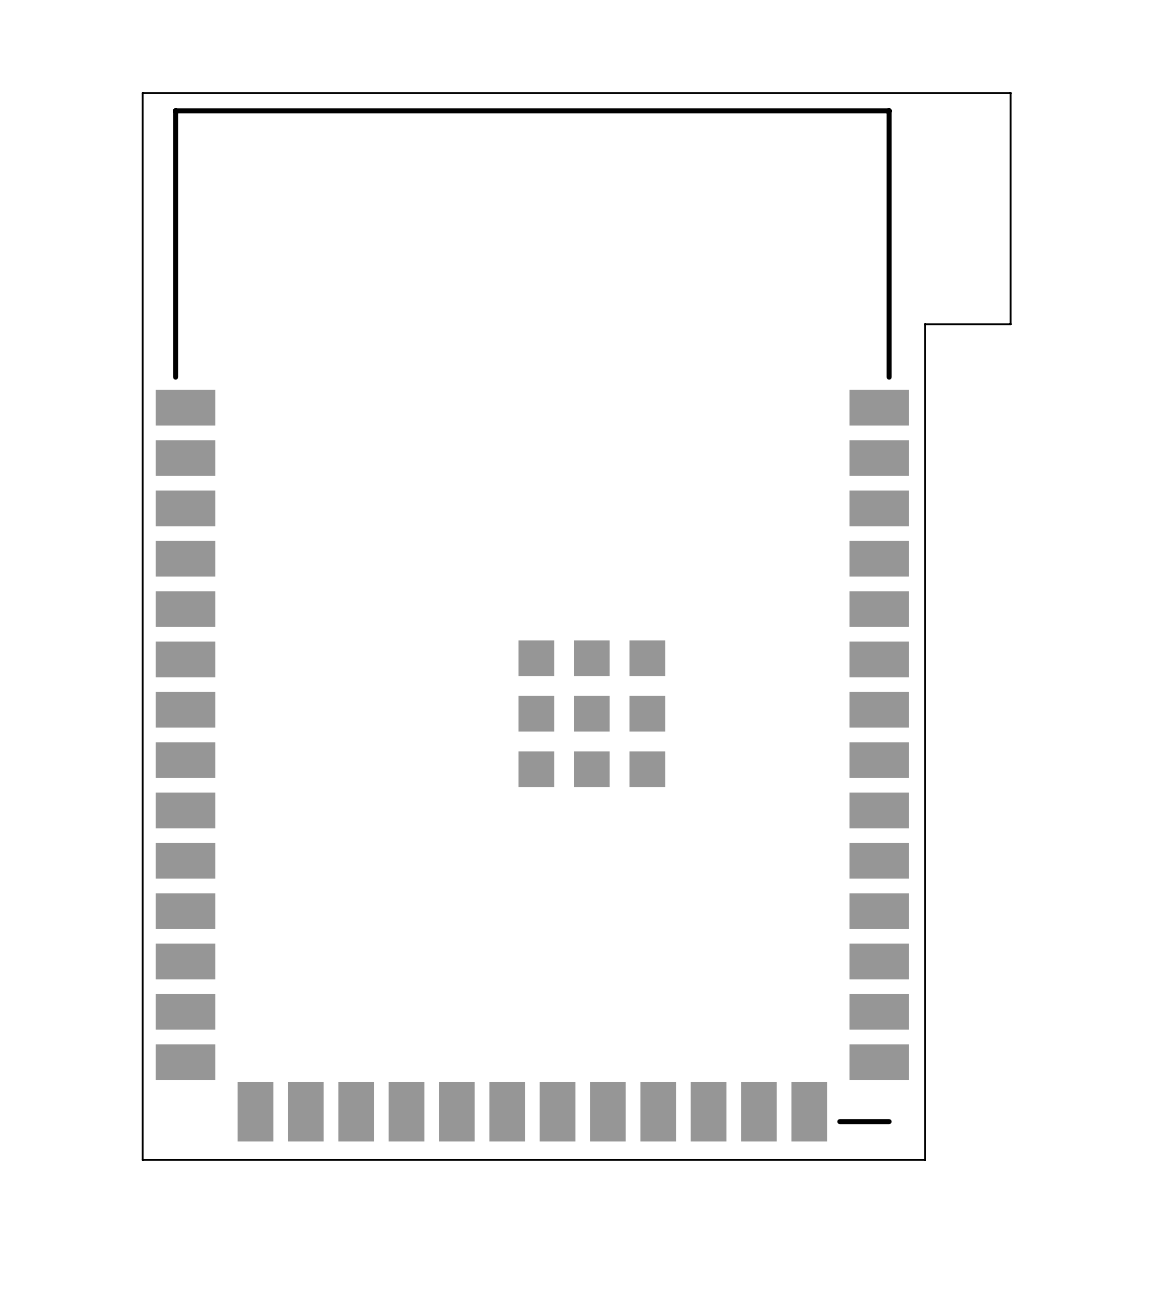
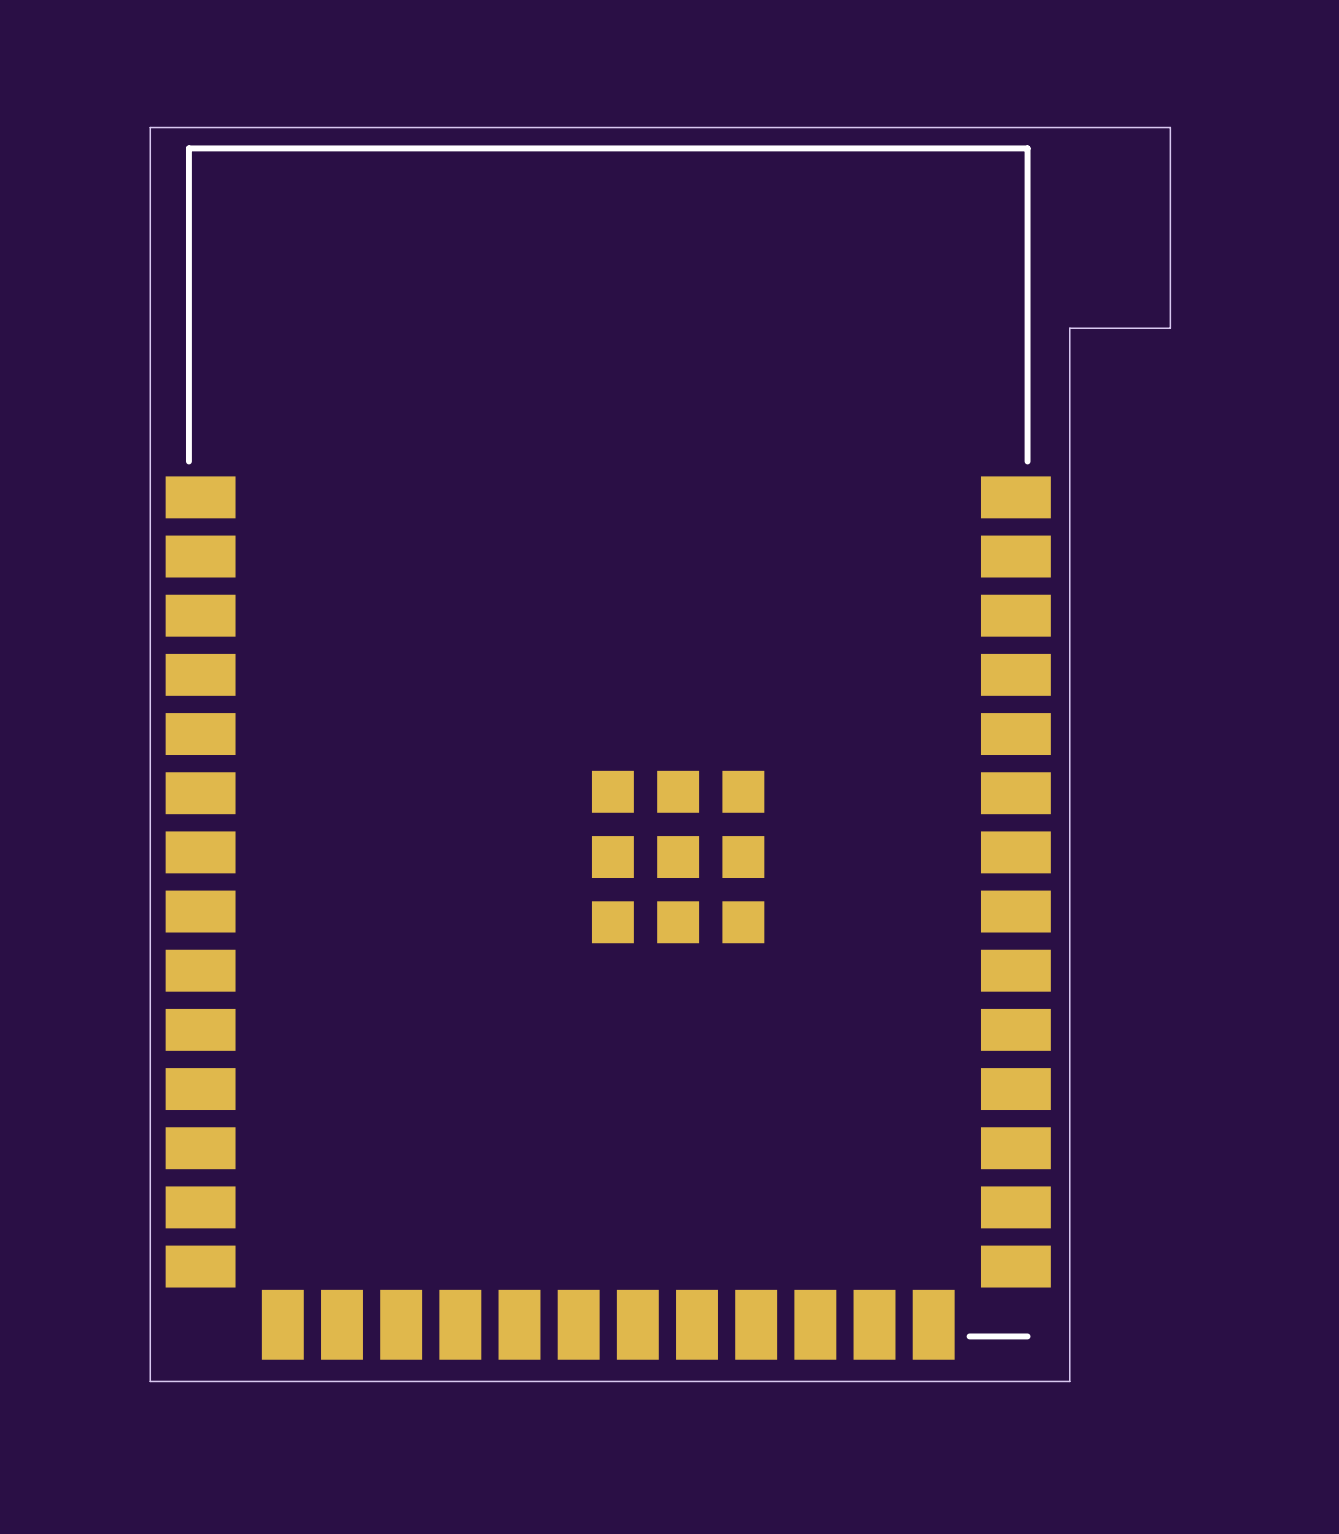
board edge: (1010, 263) (1010, 324) (925, 324) -> (1170, 328) (1069, 328) (1069, 399)

